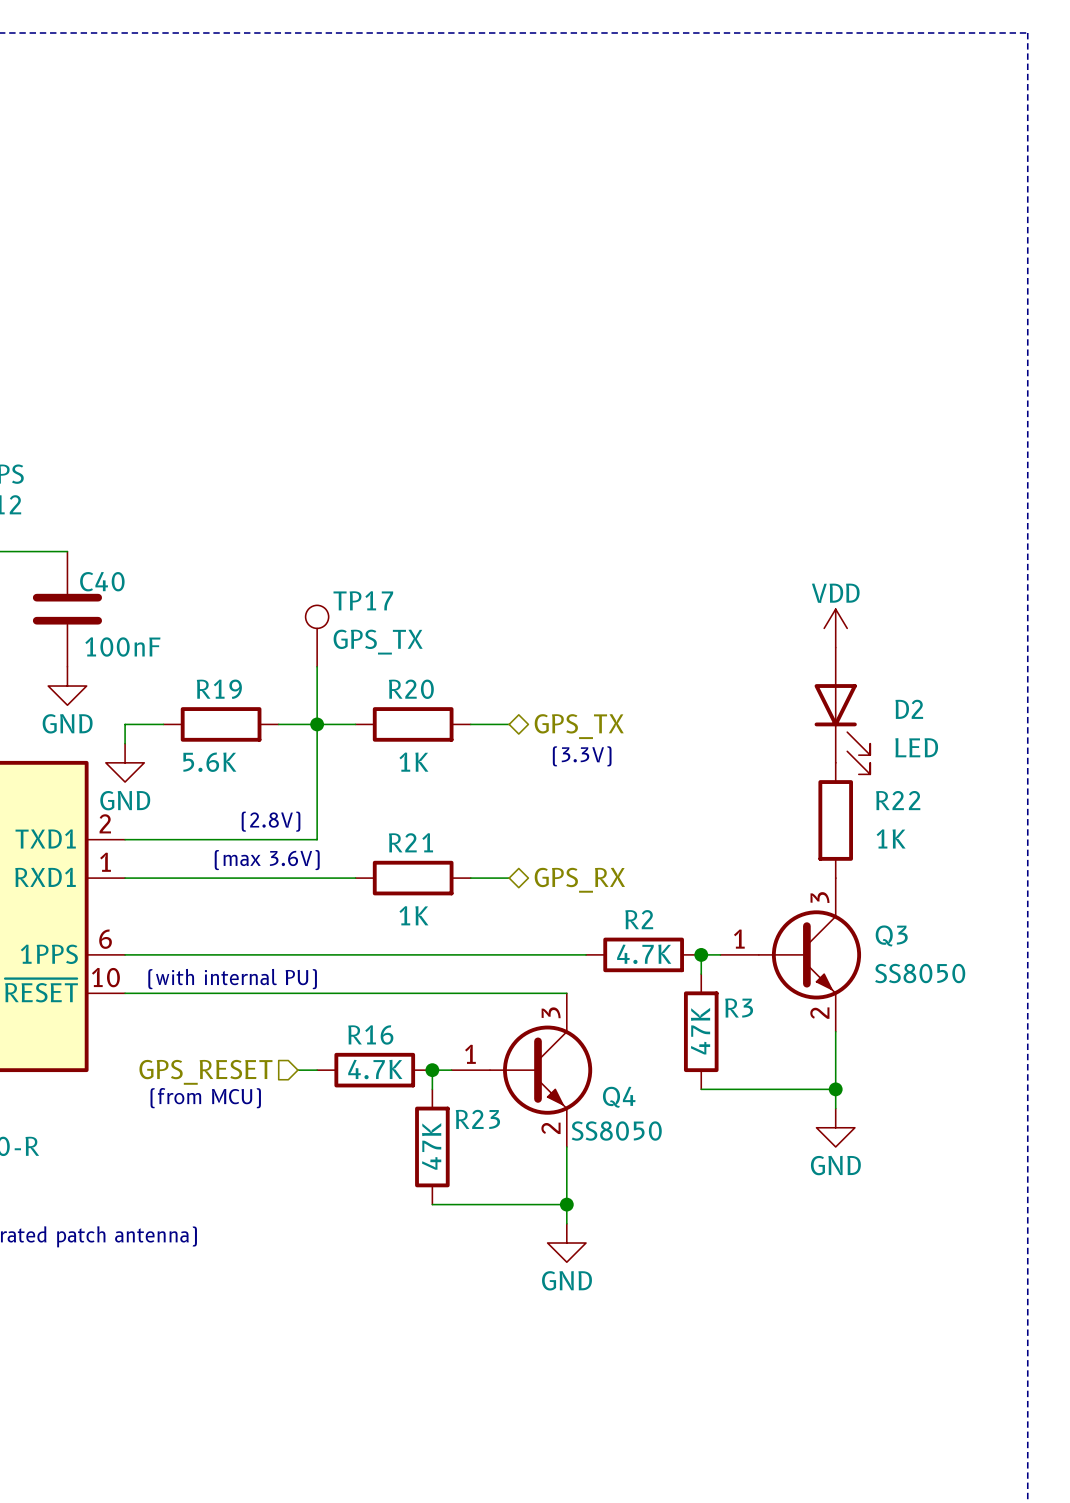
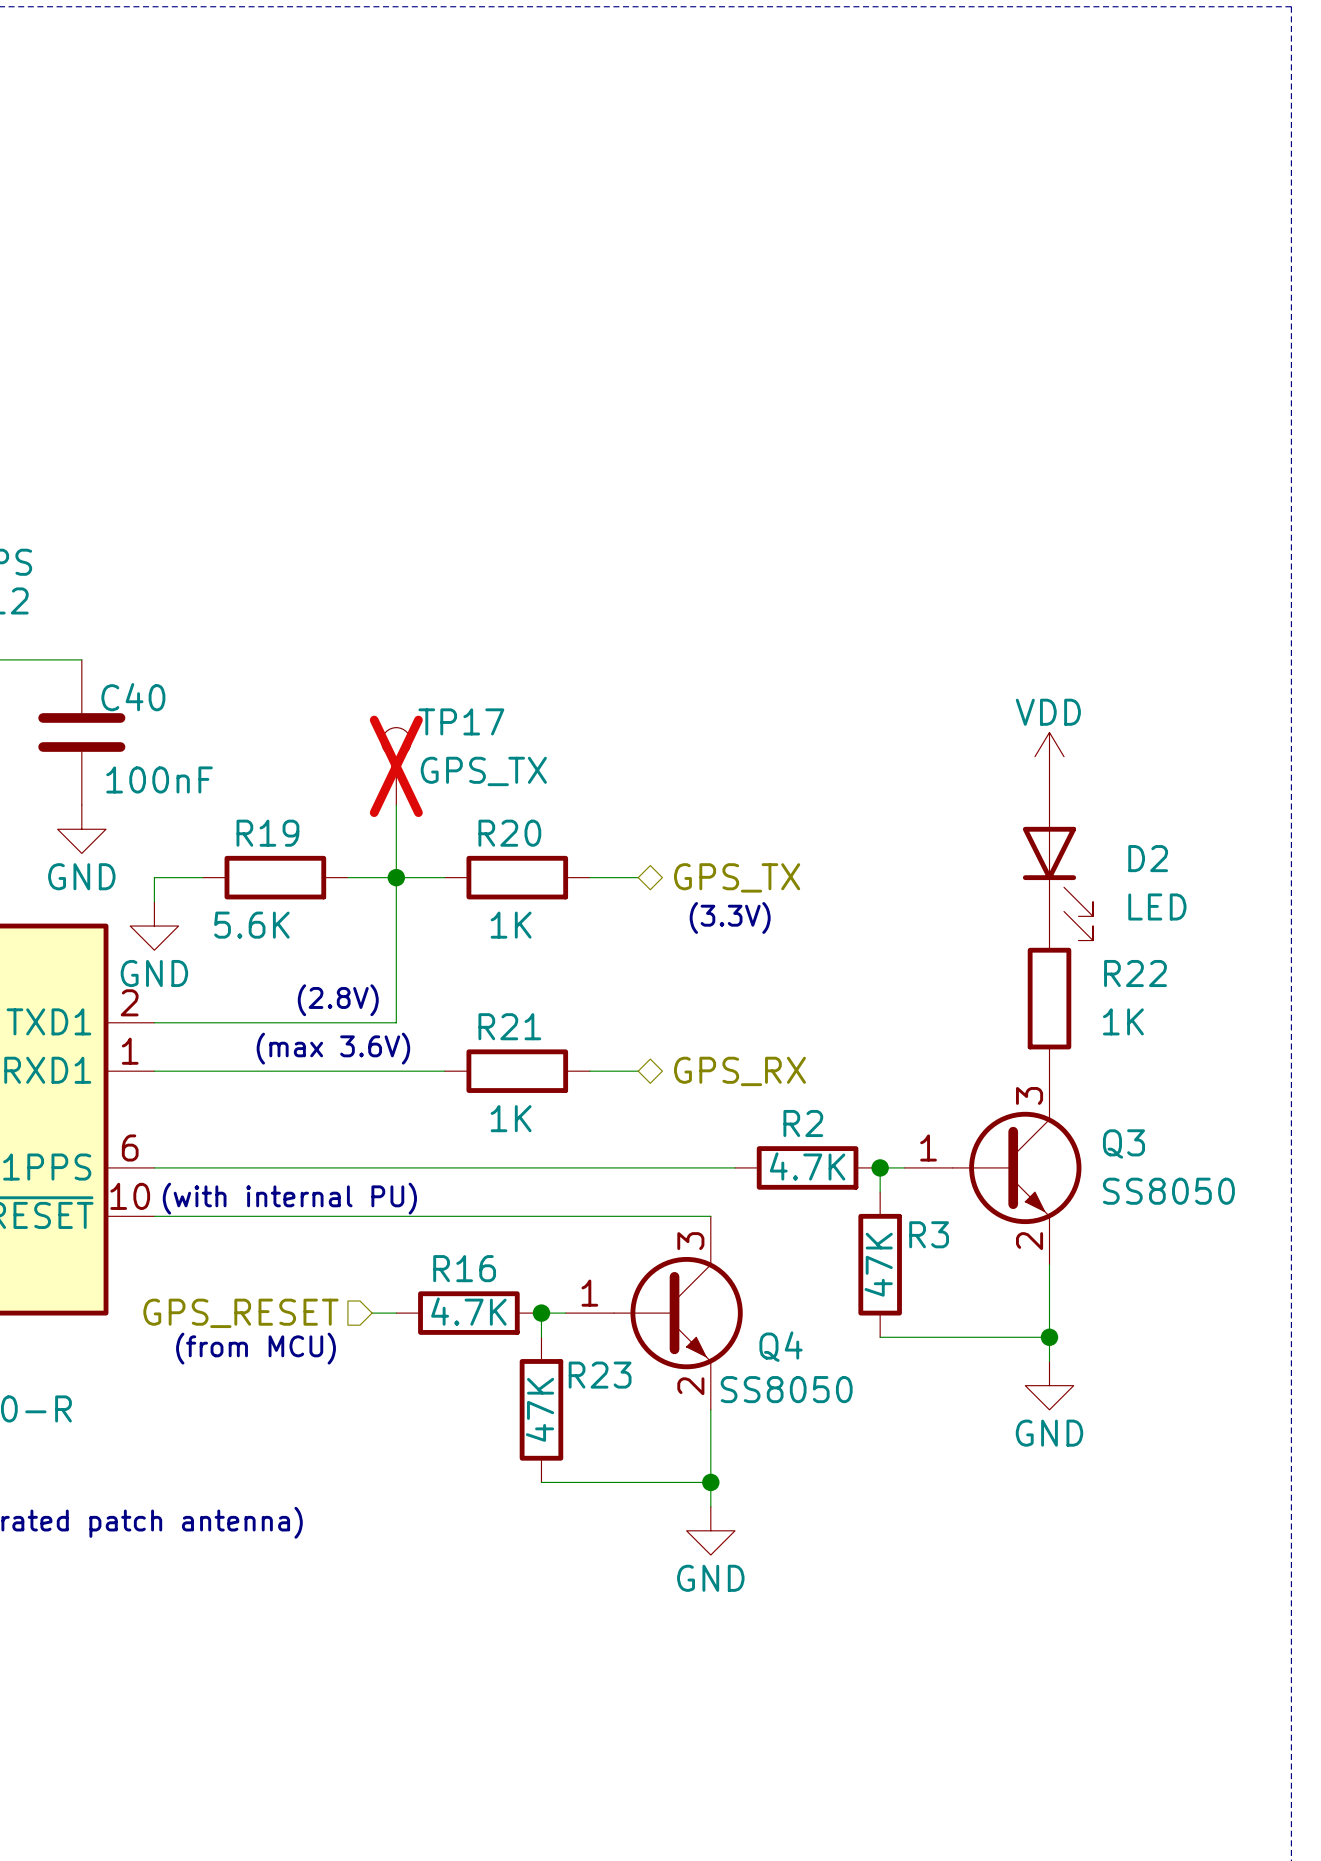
TP17 do-not-place cross: none -> (396, 766)

